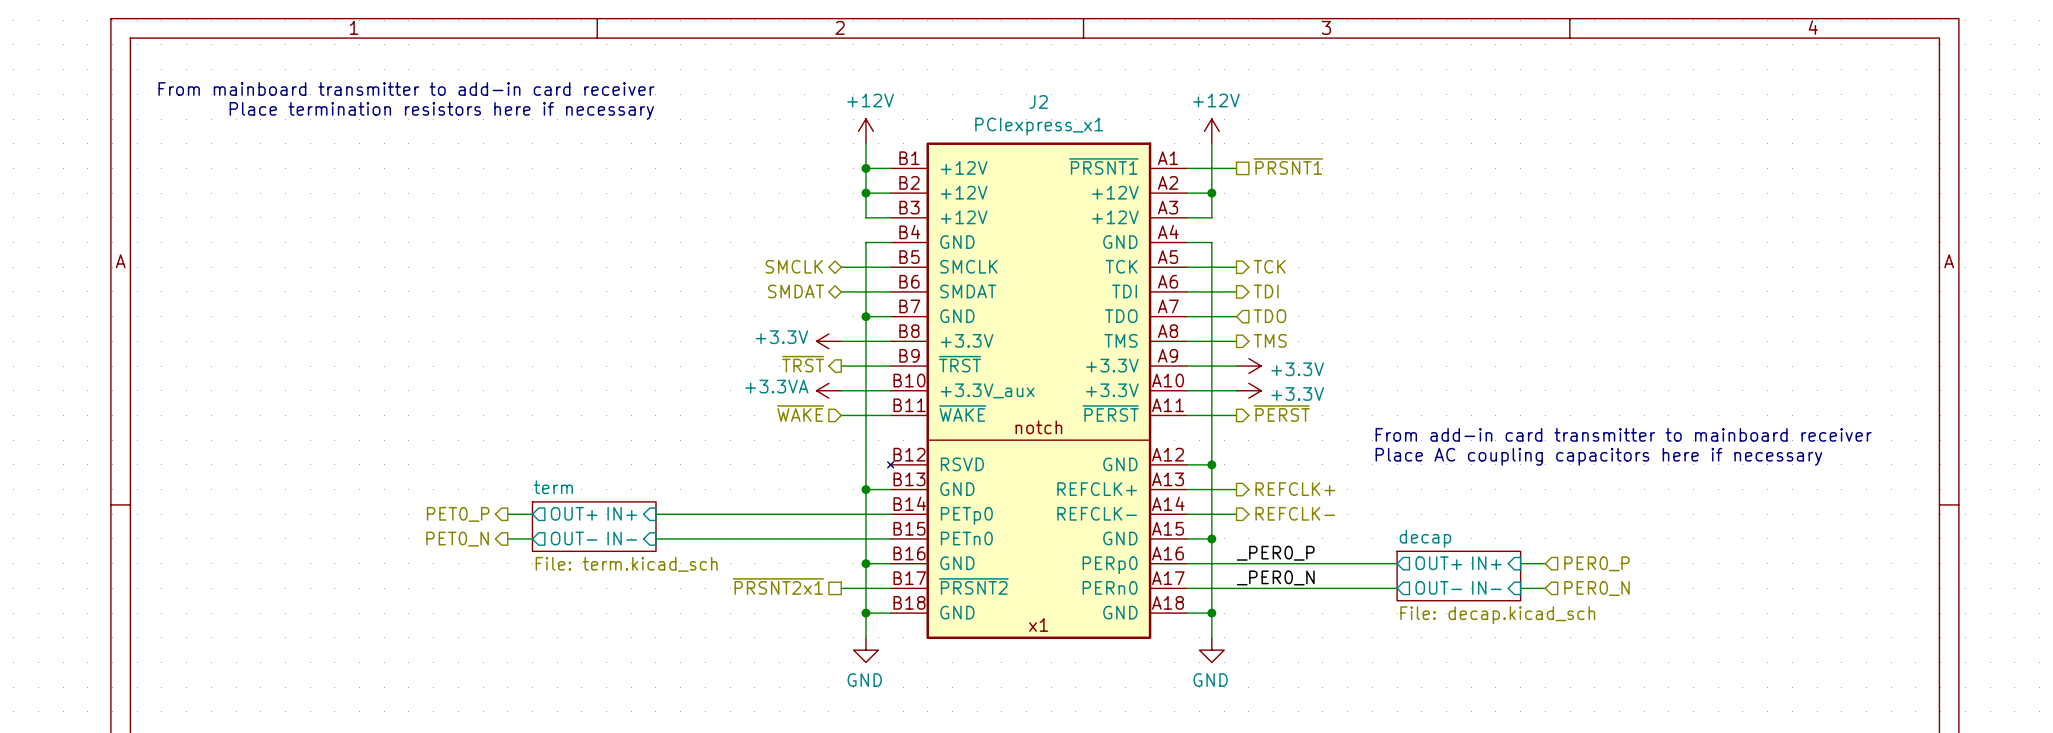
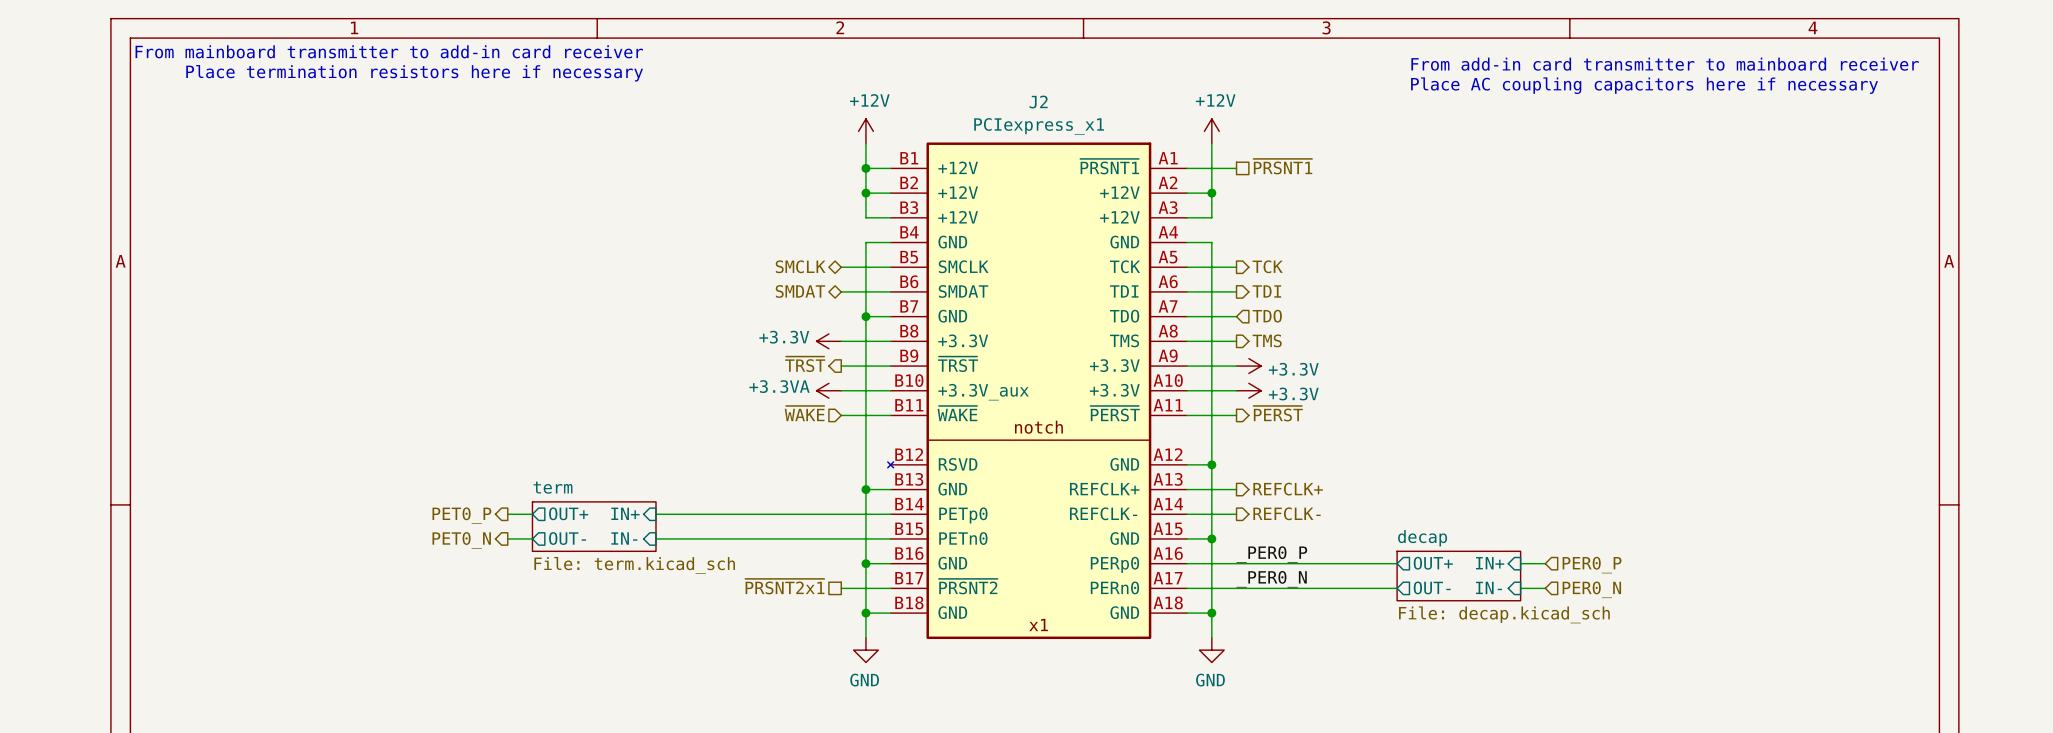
text: none -> From add-in card transmitter to mainboard receiver (1665, 64)
text: none -> Place AC coupling capacitors here if necessary (1644, 85)
text position: From mainboard transmitter to add-in card receiver (406, 89) -> From mainboard transmitter to add-in card receiver (389, 51)
text position: Place termination resistors here if necessary (441, 110) -> Place termination resistors here if necessary (414, 73)
text: From add-in card transmitter to mainboard receiver (1623, 434) -> none
text: Place AC coupling capacitors here if necessary (1598, 456) -> none

